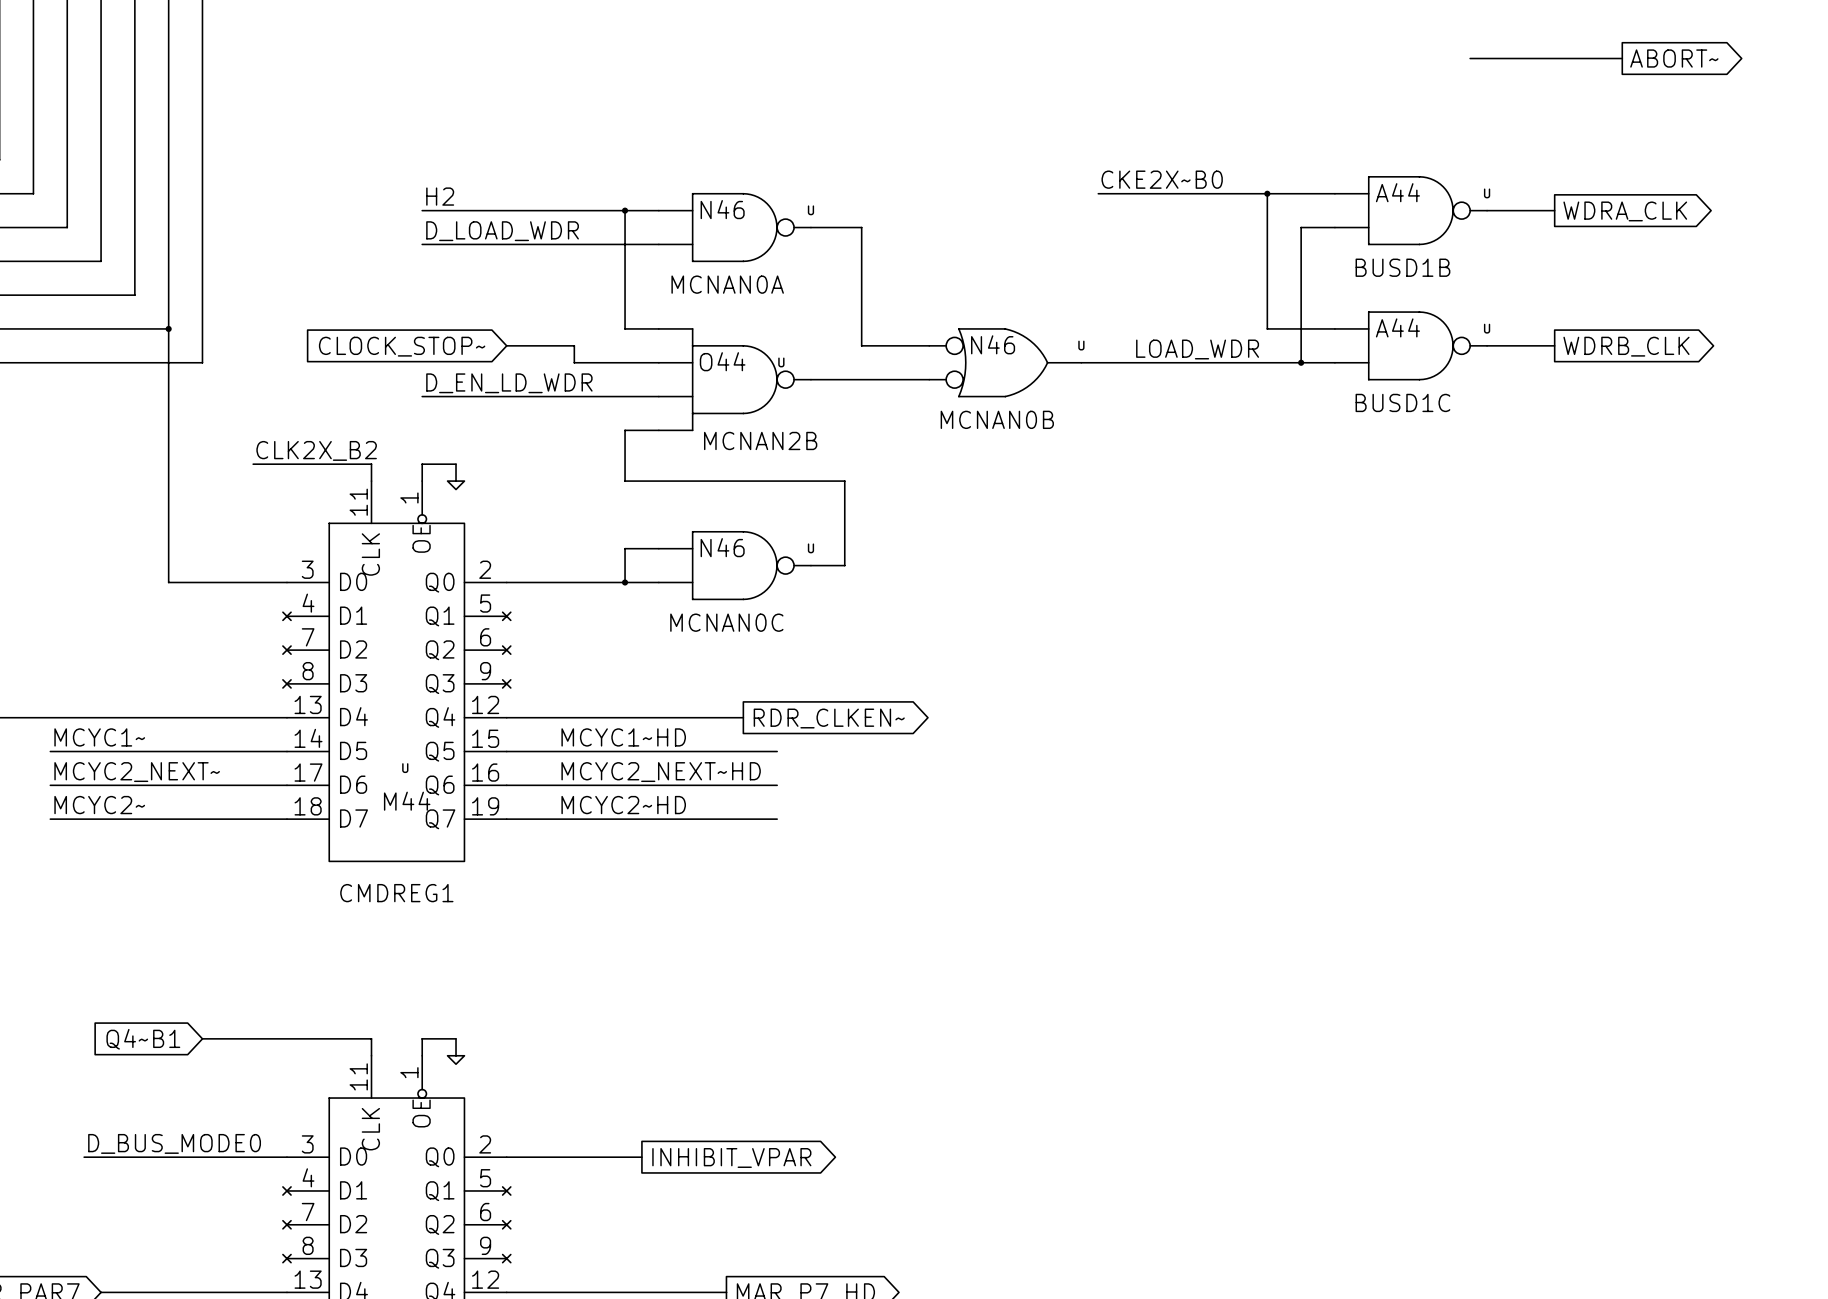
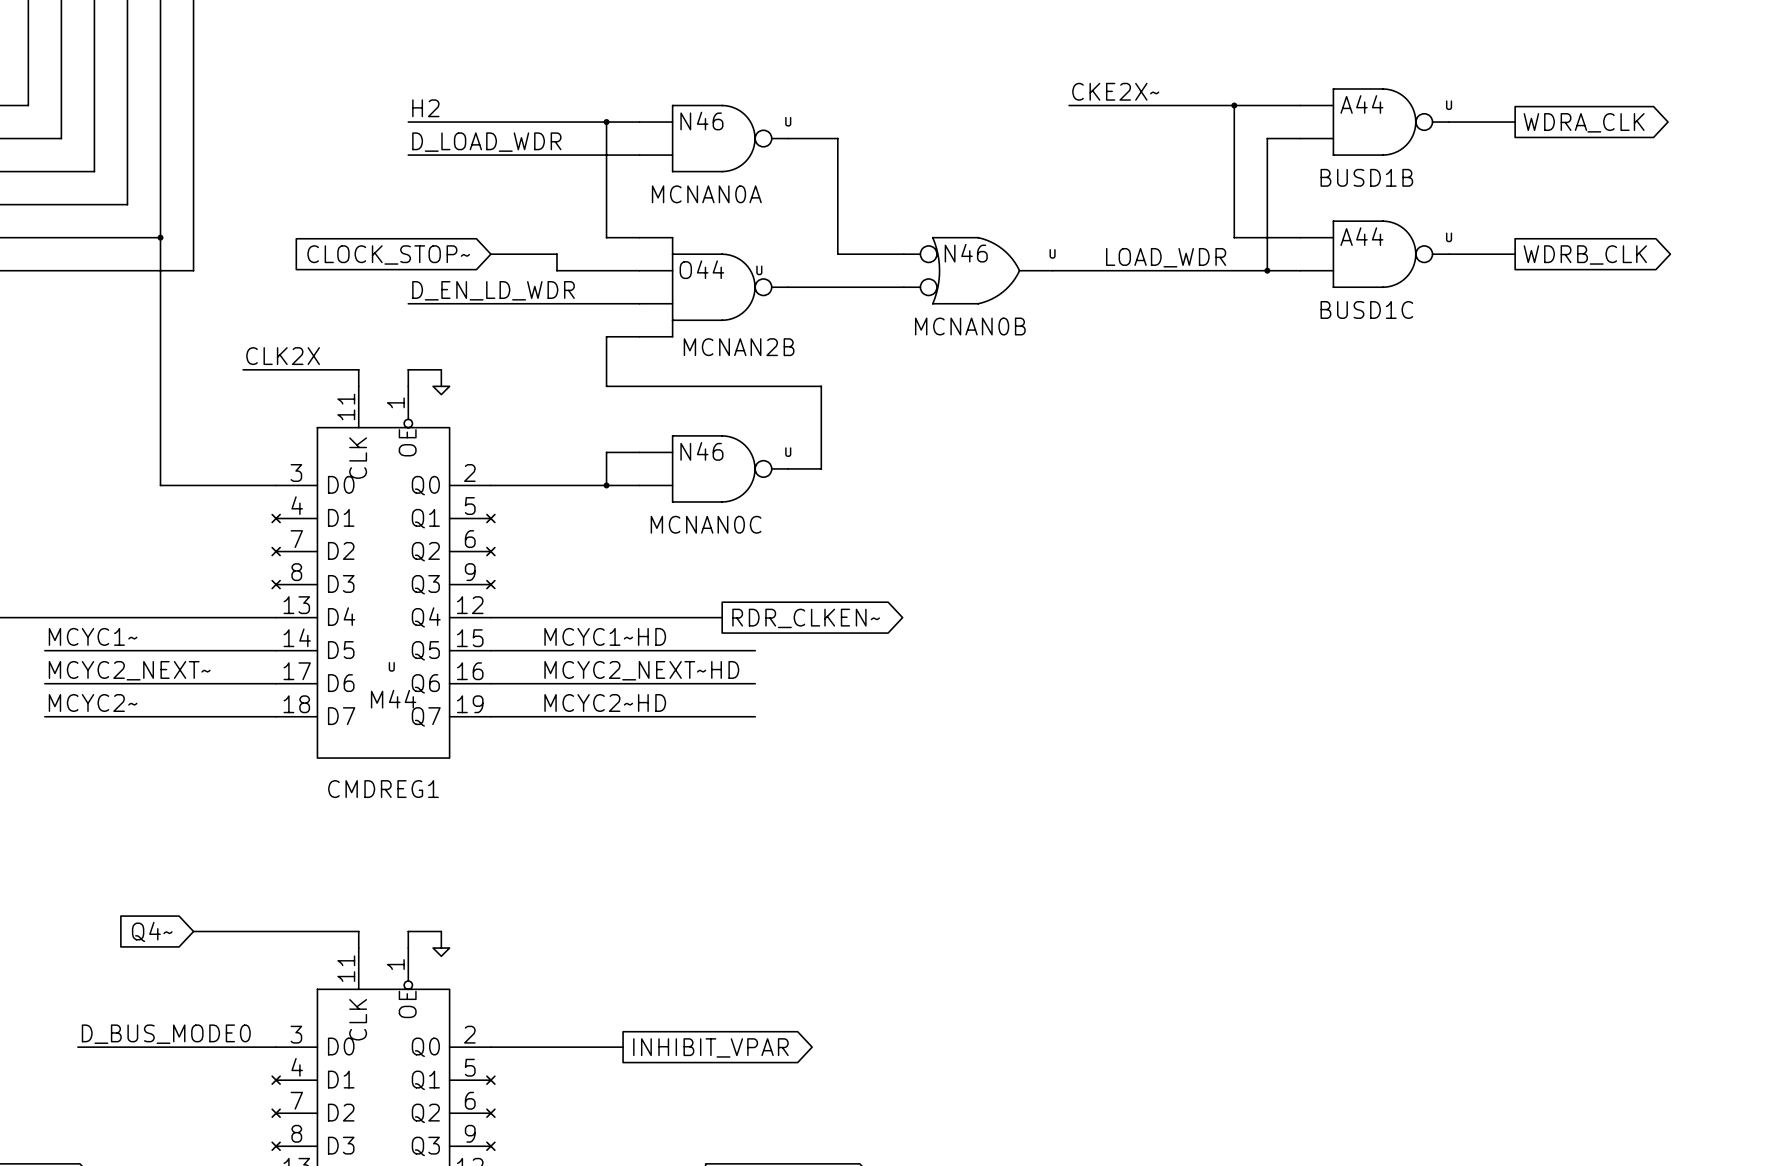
label: CKE2X~B0 (1162, 179) -> CKE2X~ (1115, 91)
label: CLK2X_B2 (316, 450) -> CLK2X (283, 356)
global label: Q4~B1 (143, 1039) -> Q4~ (152, 931)

